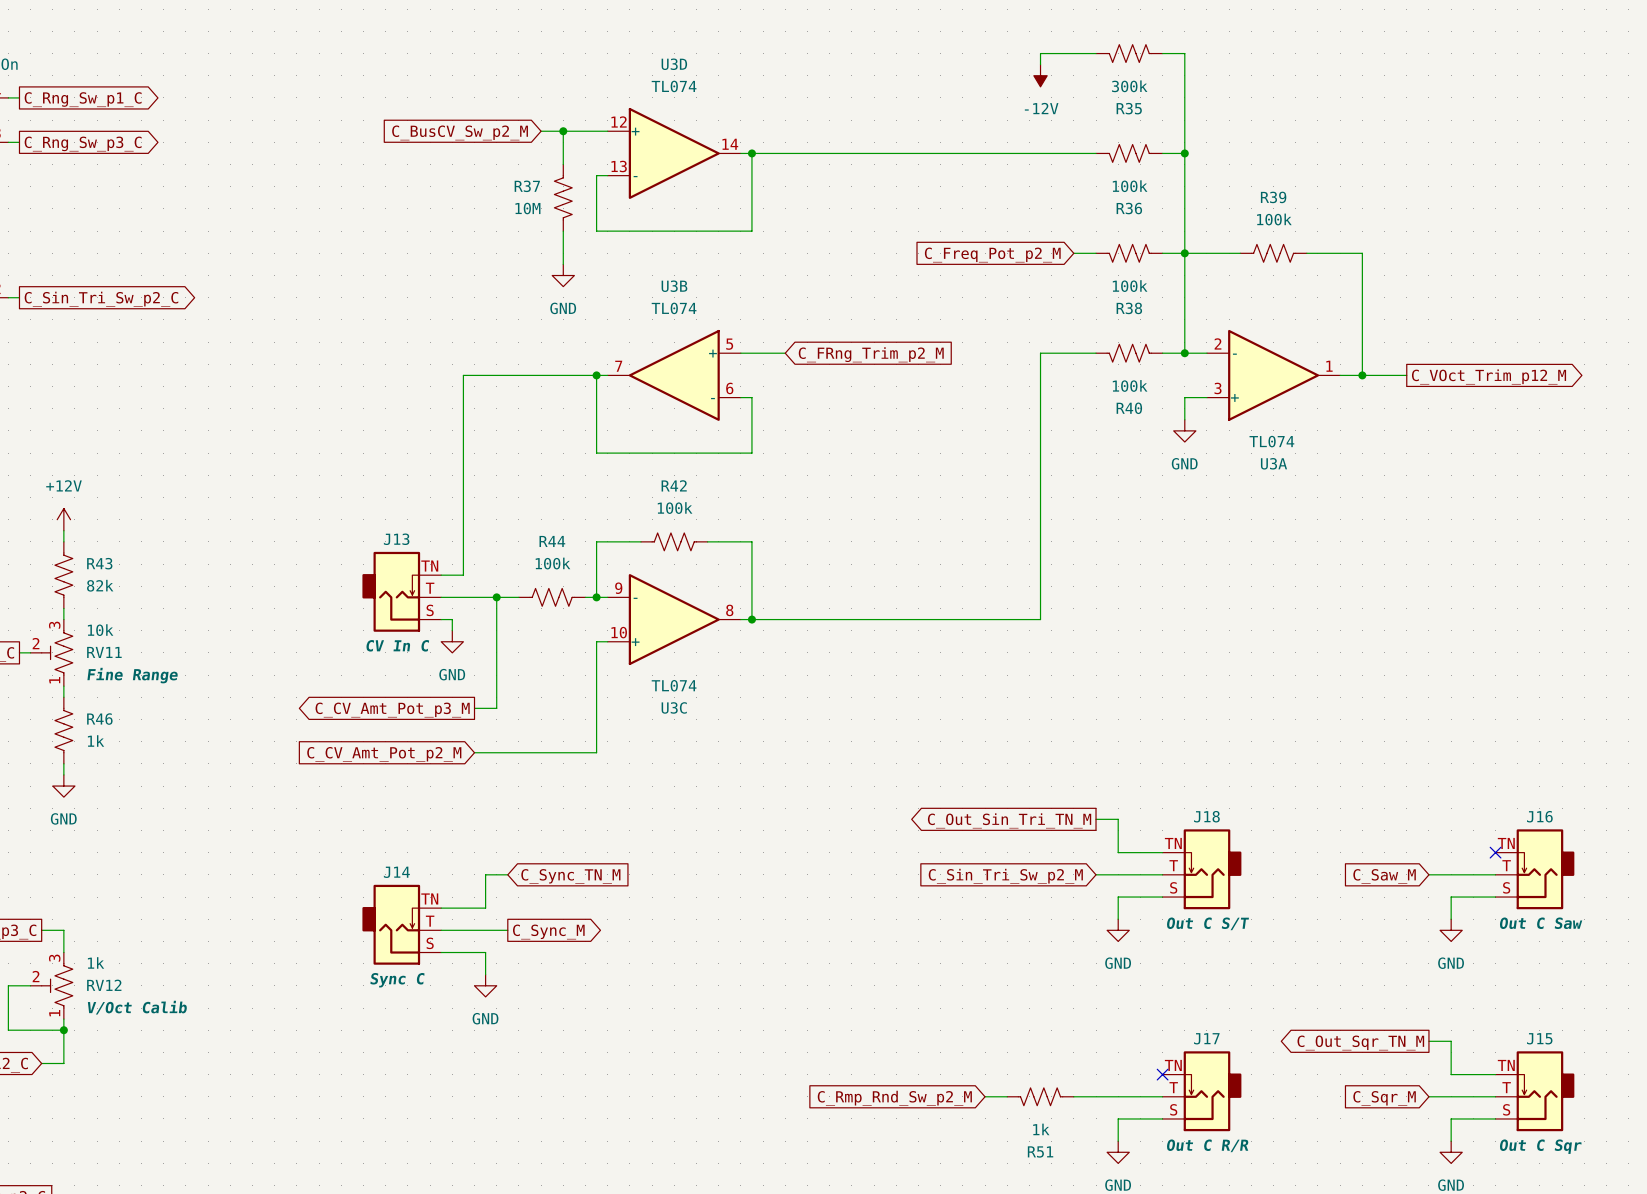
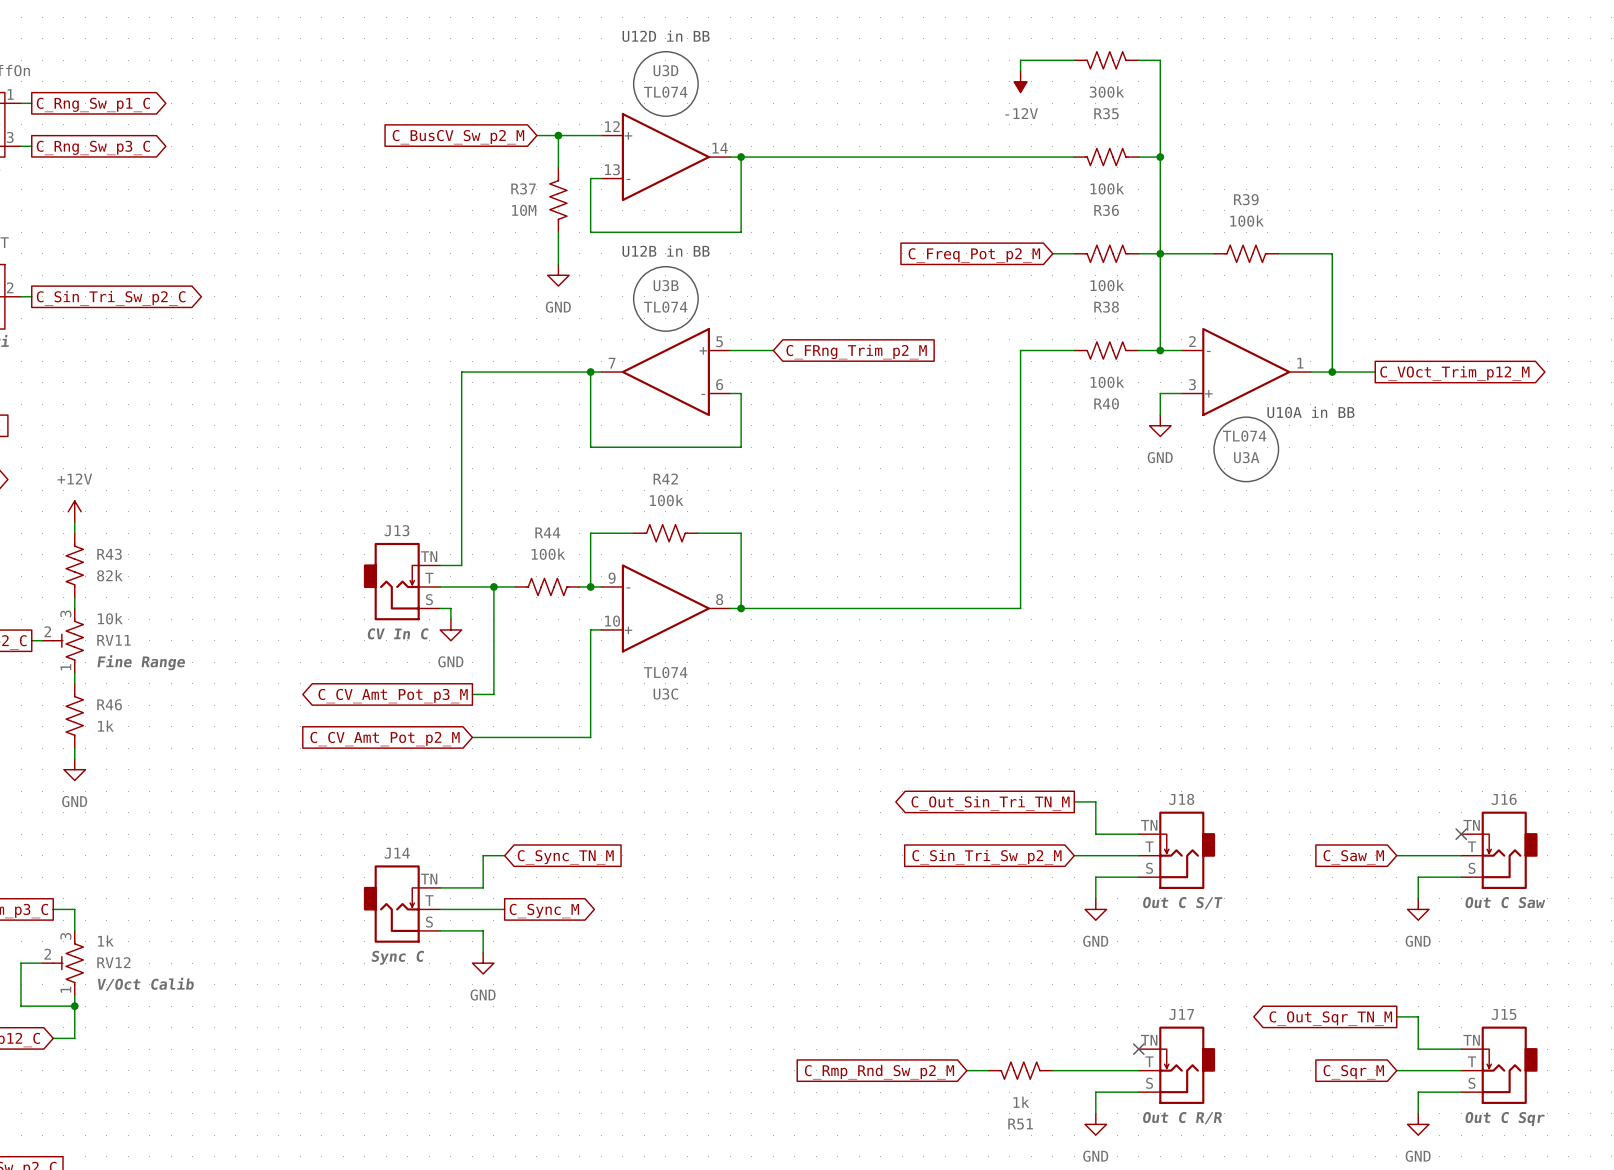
text: none -> U12D in BB (666, 36)
drawing: none -> [633, 51, 699, 117]
text: none -> U12B in BB (666, 251)
drawing: none -> [633, 266, 699, 332]
text: none -> U10A in BB (1310, 412)
drawing: none -> [1214, 417, 1279, 482]

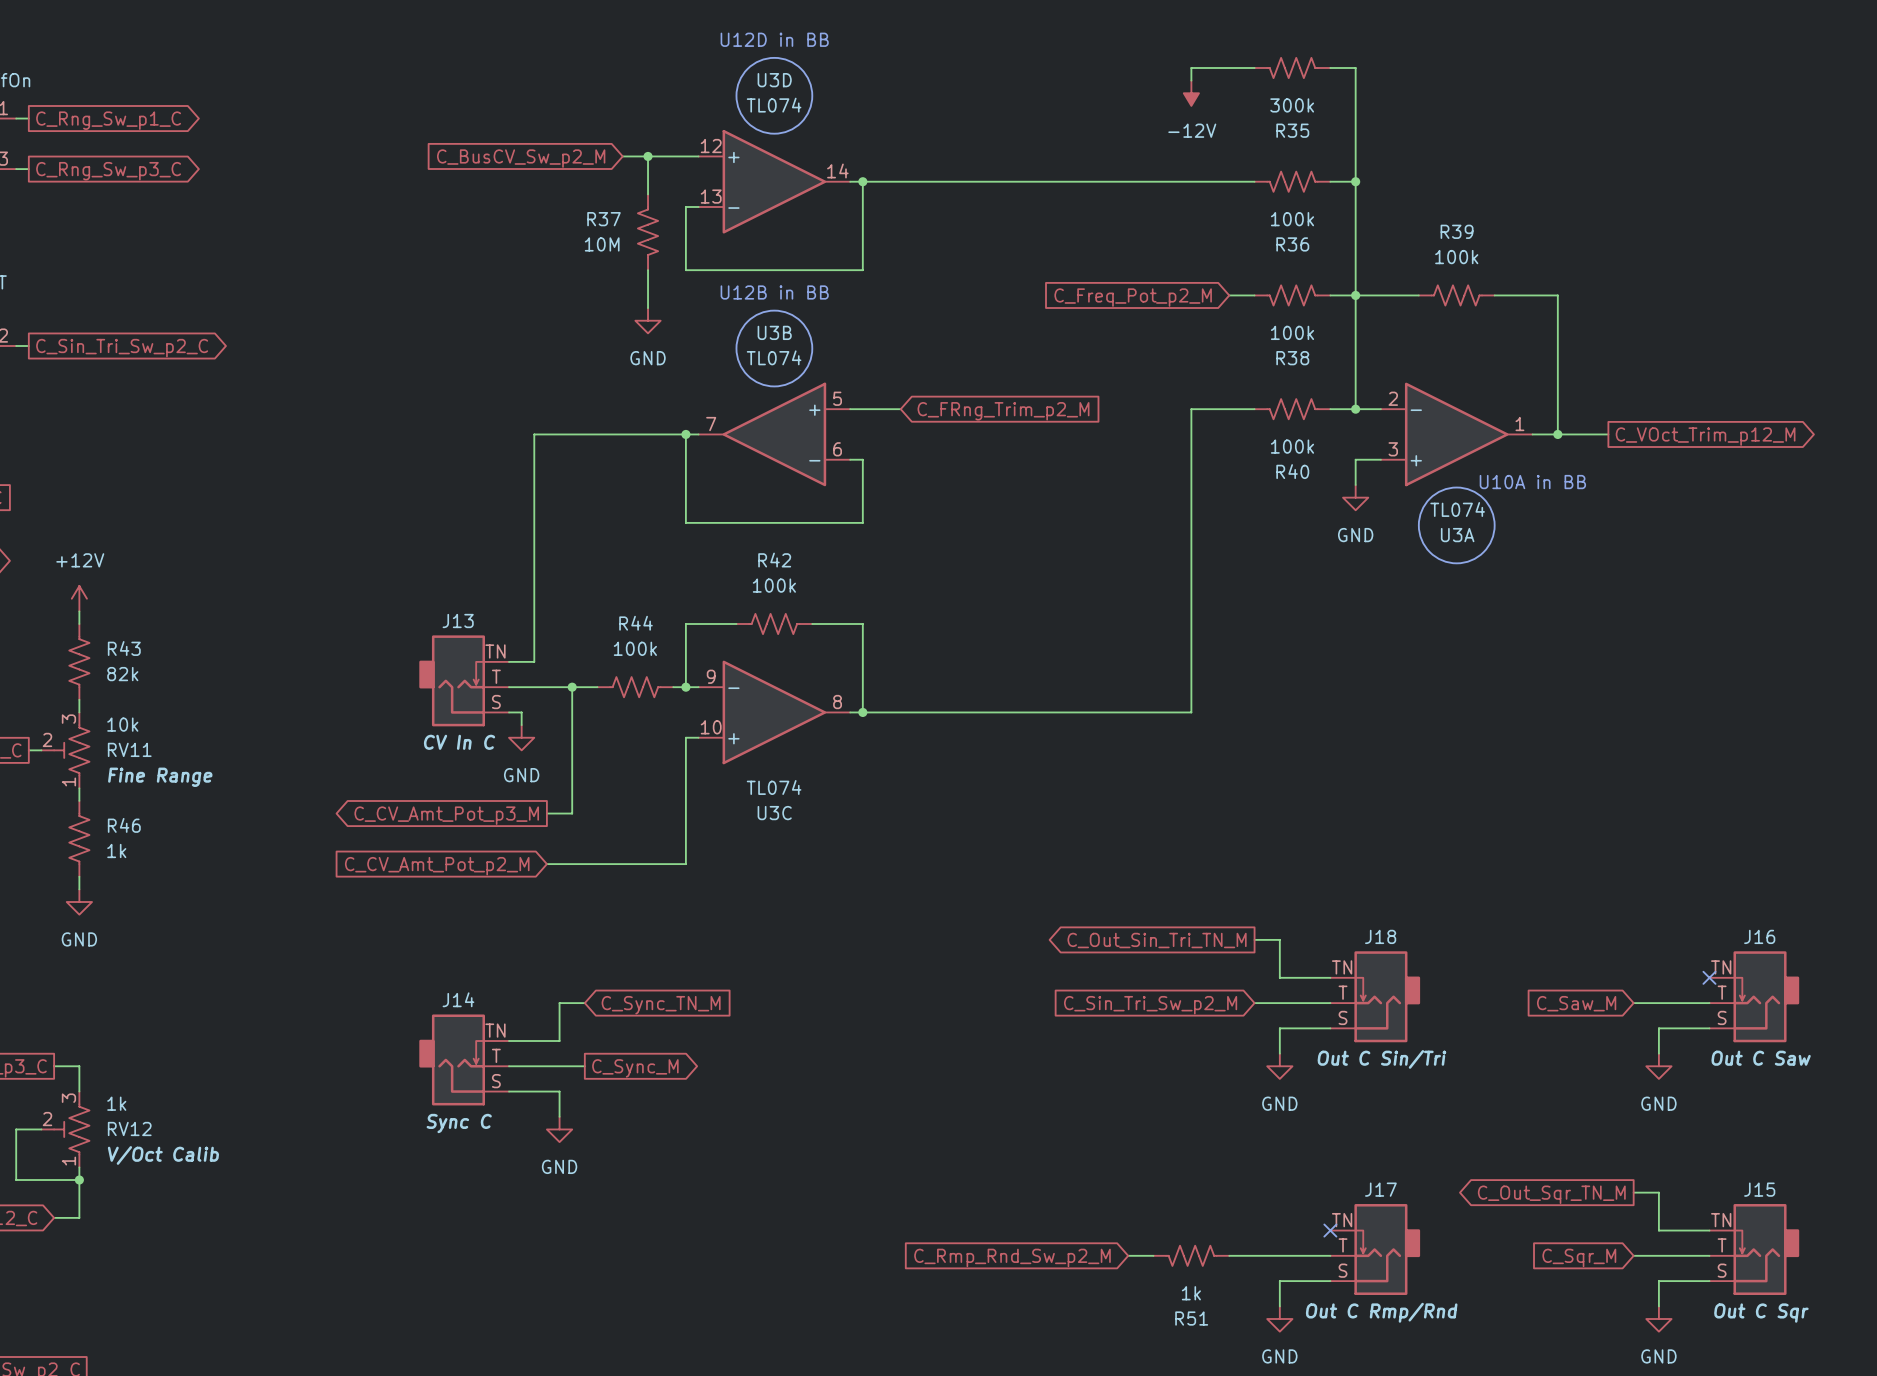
J18 text: Out C S/T (1182, 903) -> Out C Sin/Tri (1381, 1059)
J17 text: Out C R/R (1182, 1118) -> Out C Rmp/Rnd (1381, 1312)

